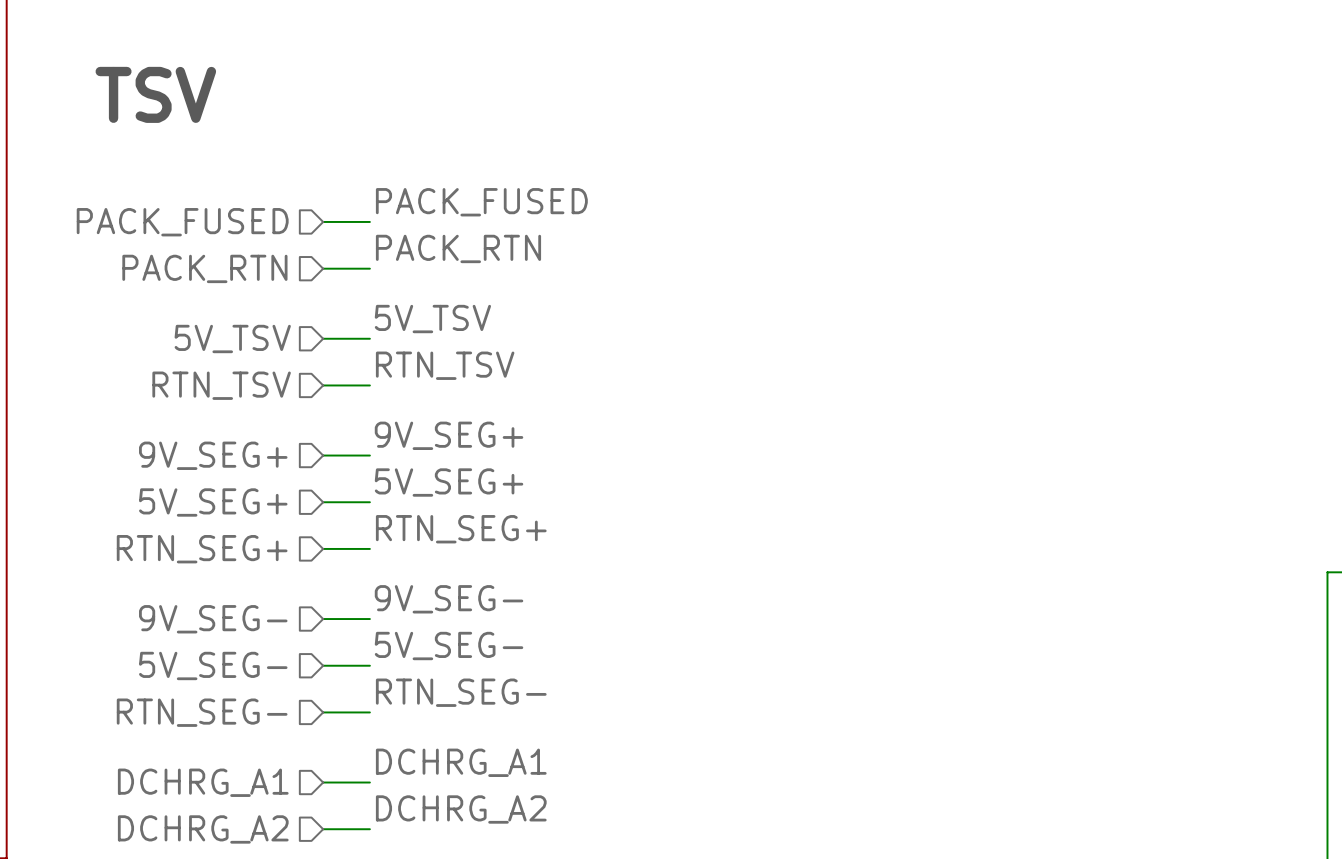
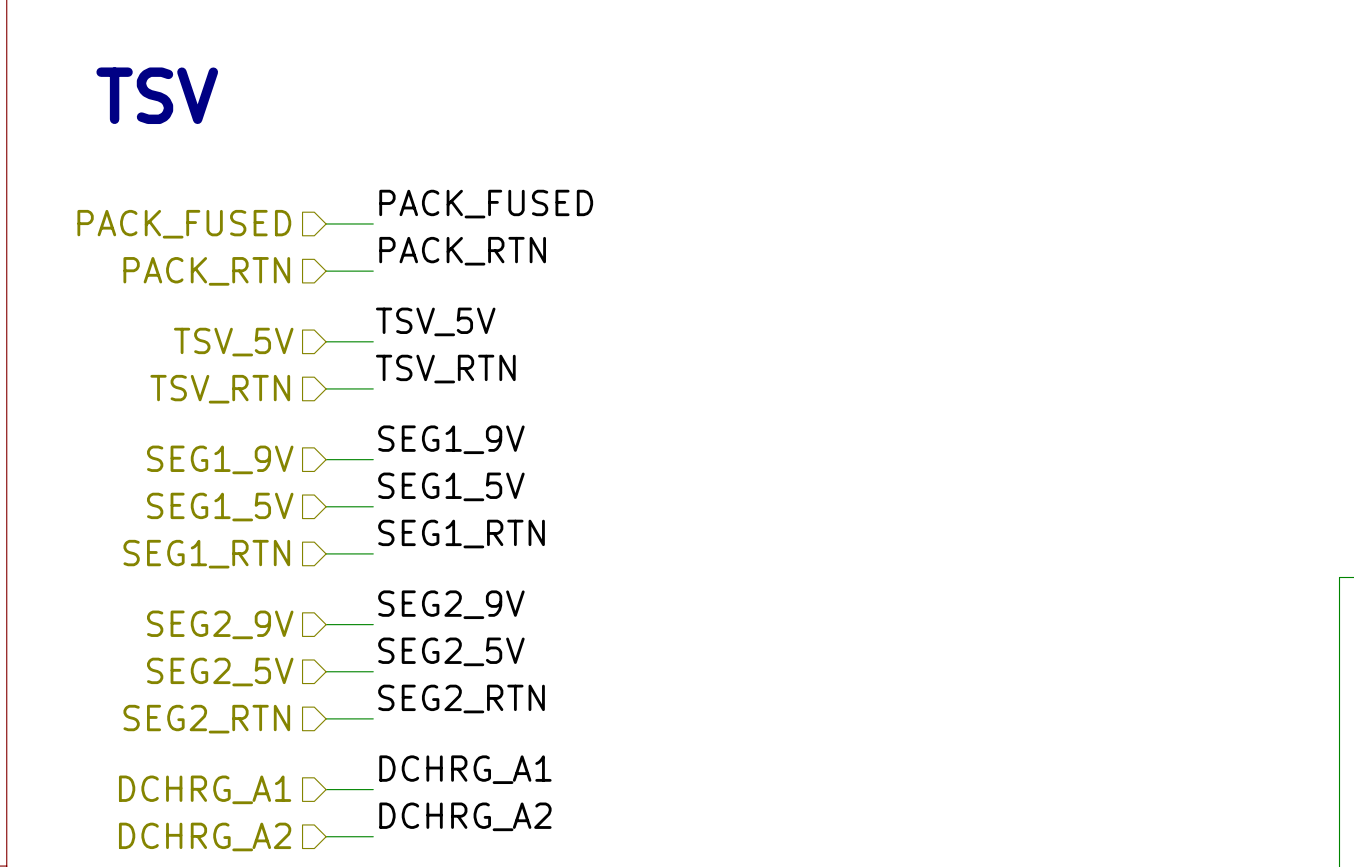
label: 5V_TSV (432, 319) -> TSV_5V (435, 321)
hierarchical label: 5V_TSV (232, 338) -> TSV_5V (233, 342)
label: RTN_TSV (445, 365) -> TSV_RTN (445, 369)
hierarchical label: RTN_TSV (221, 385) -> TSV_RTN (220, 389)
label: 9V_SEG+ (449, 435) -> SEG1_9V (451, 439)
hierarchical label: 9V_SEG+ (213, 455) -> SEG1_9V (220, 459)
label: 5V_SEG+ (449, 482) -> SEG1_5V (451, 486)
hierarchical label: 5V_SEG+ (213, 502) -> SEG1_5V (220, 507)
label: RTN_SEG+ (461, 529) -> SEG1_RTN (461, 534)
hierarchical label: RTN_SEG+ (202, 549) -> SEG1_RTN (206, 554)
label: 9V_SEG- (449, 599) -> SEG2_9V (451, 604)
hierarchical label: 9V_SEG- (213, 619) -> SEG2_9V (220, 624)
label: 5V_SEG- (449, 646) -> SEG2_5V (451, 651)
hierarchical label: 5V_SEG- (213, 665) -> SEG2_5V (220, 672)
label: RTN_SEG- (461, 692) -> SEG2_RTN (461, 698)
hierarchical label: RTN_SEG- (202, 712) -> SEG2_RTN (206, 719)

